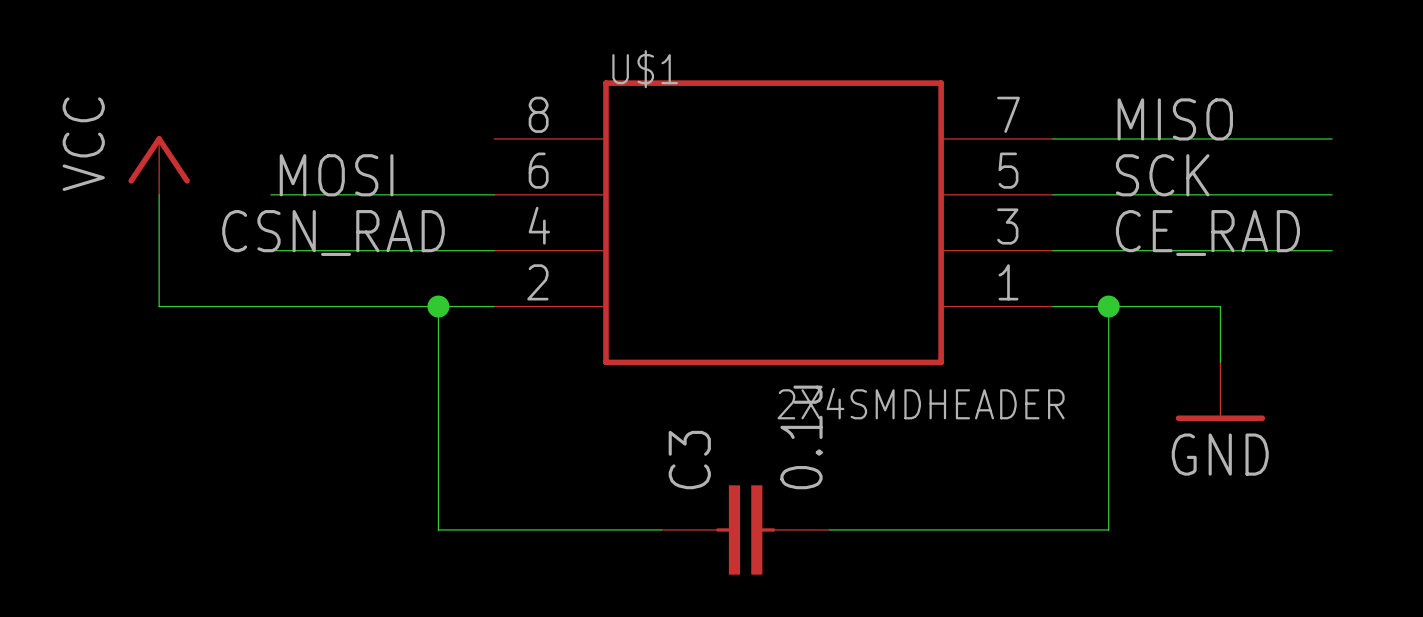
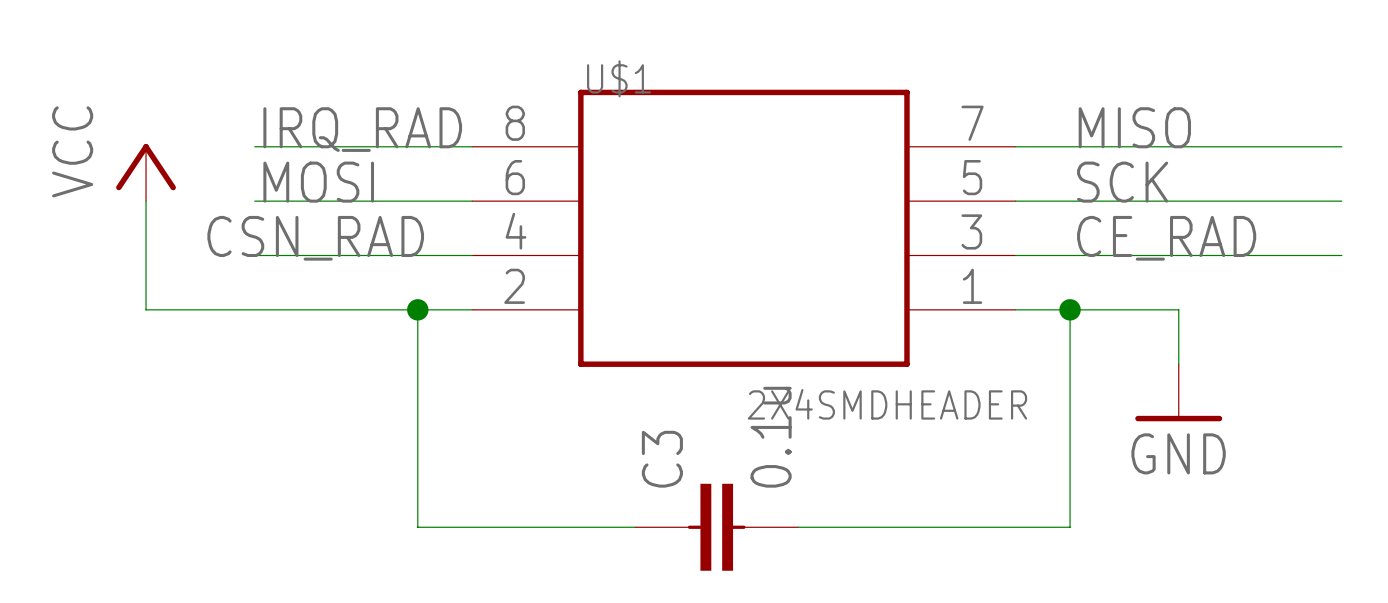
label: none -> IRQ_RAD (362, 129)
wire: none -> (254, 146) (472, 146)
wire: none -> (1287, 146) (1341, 146)
wire: none -> (1287, 201) (1341, 201)
wire: none -> (1287, 255) (1341, 255)

